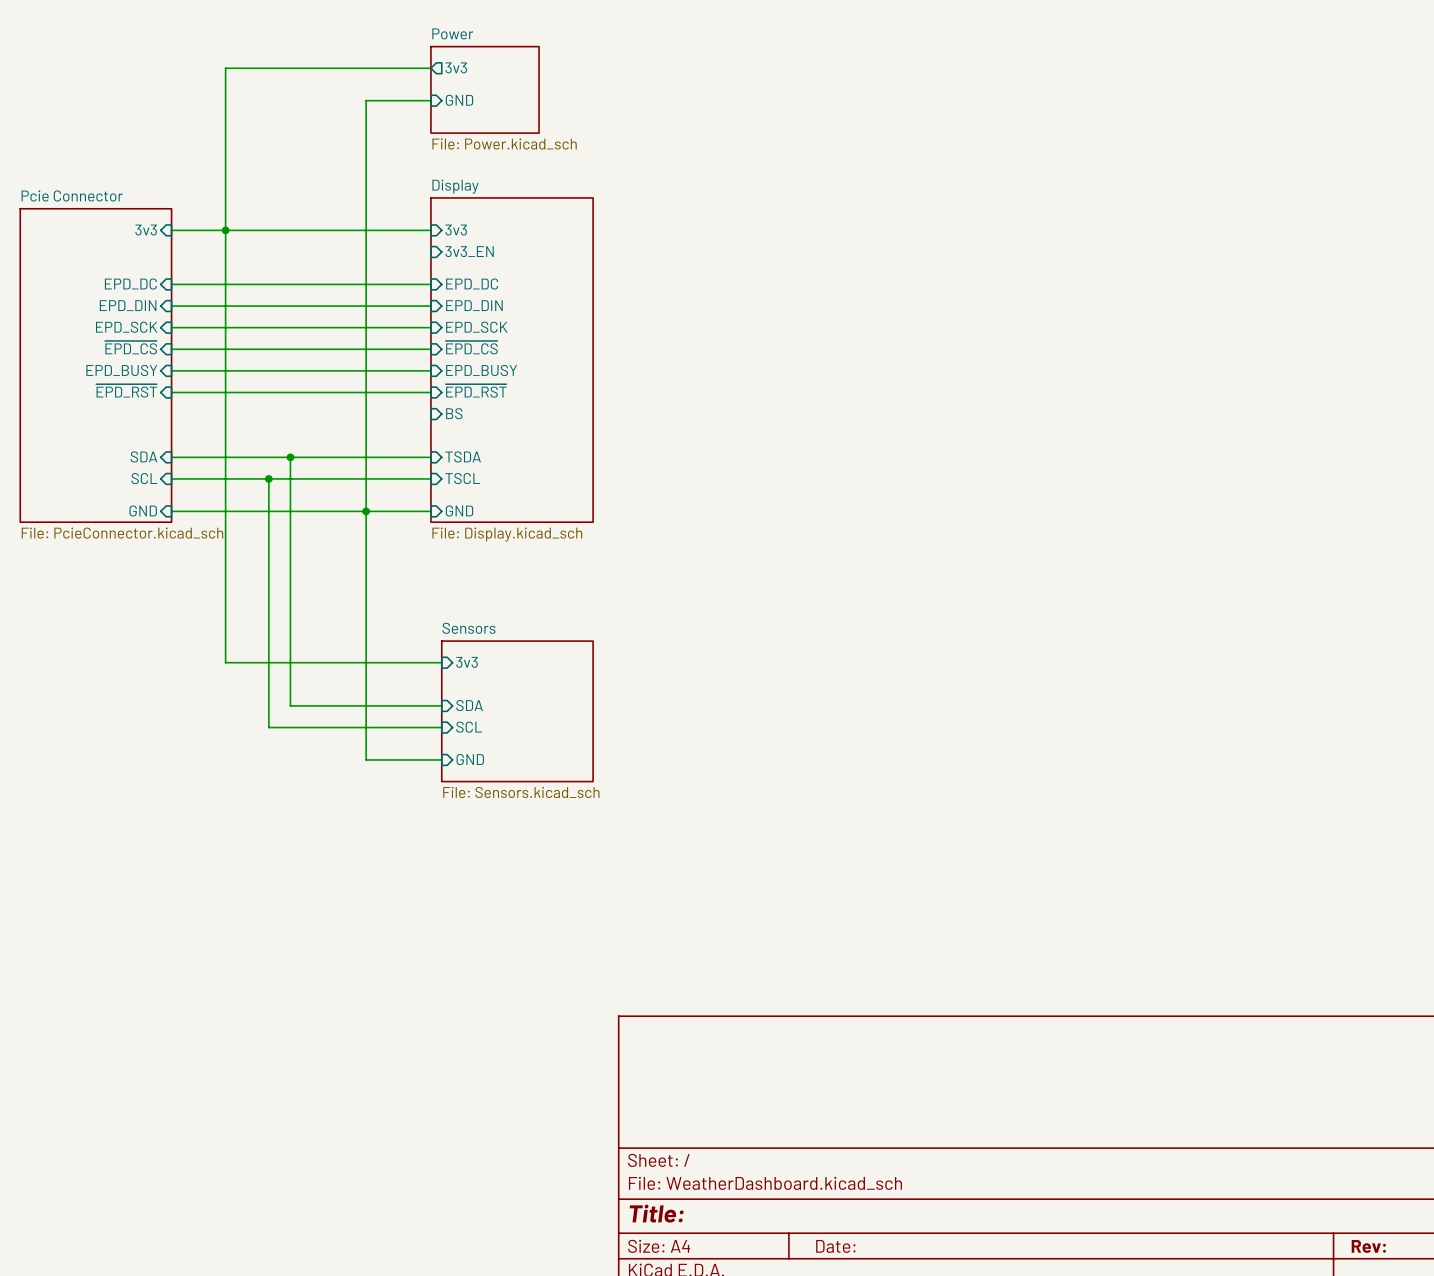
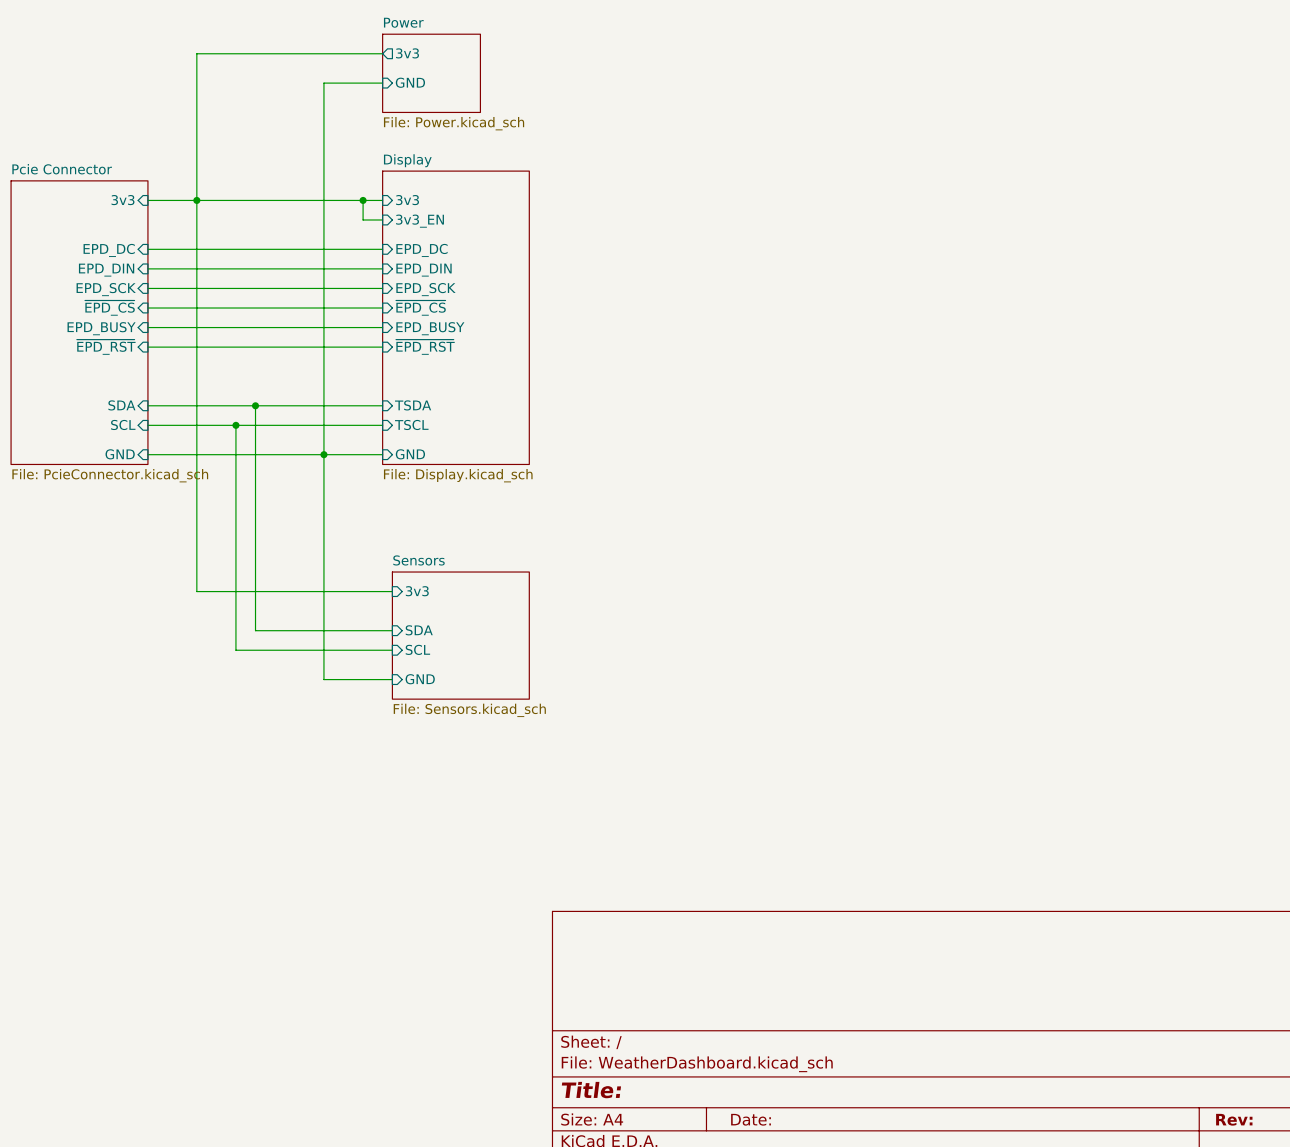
wire: none -> (363, 200) (363, 219) (382, 219)
junction: none -> (363, 200)
sheet pin: BS (454, 413) -> none

